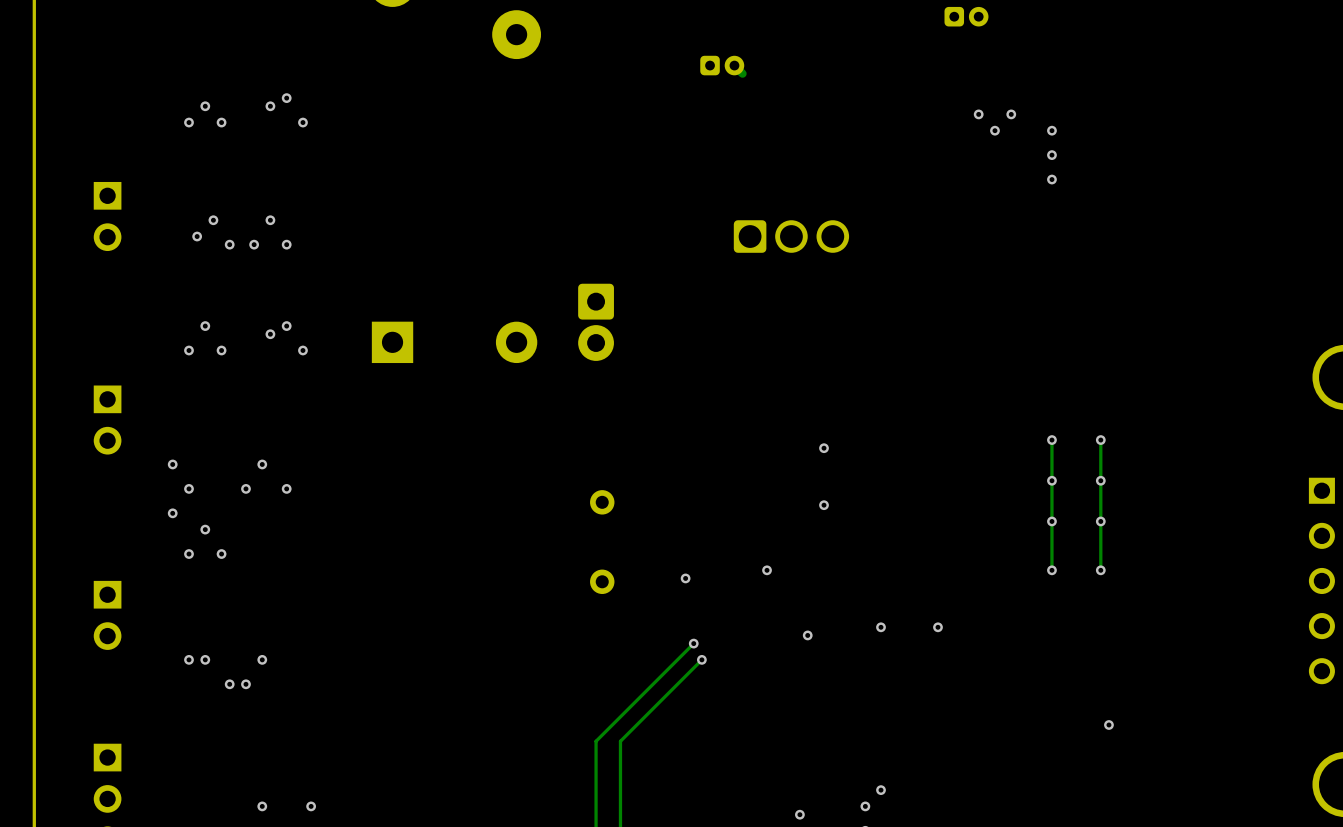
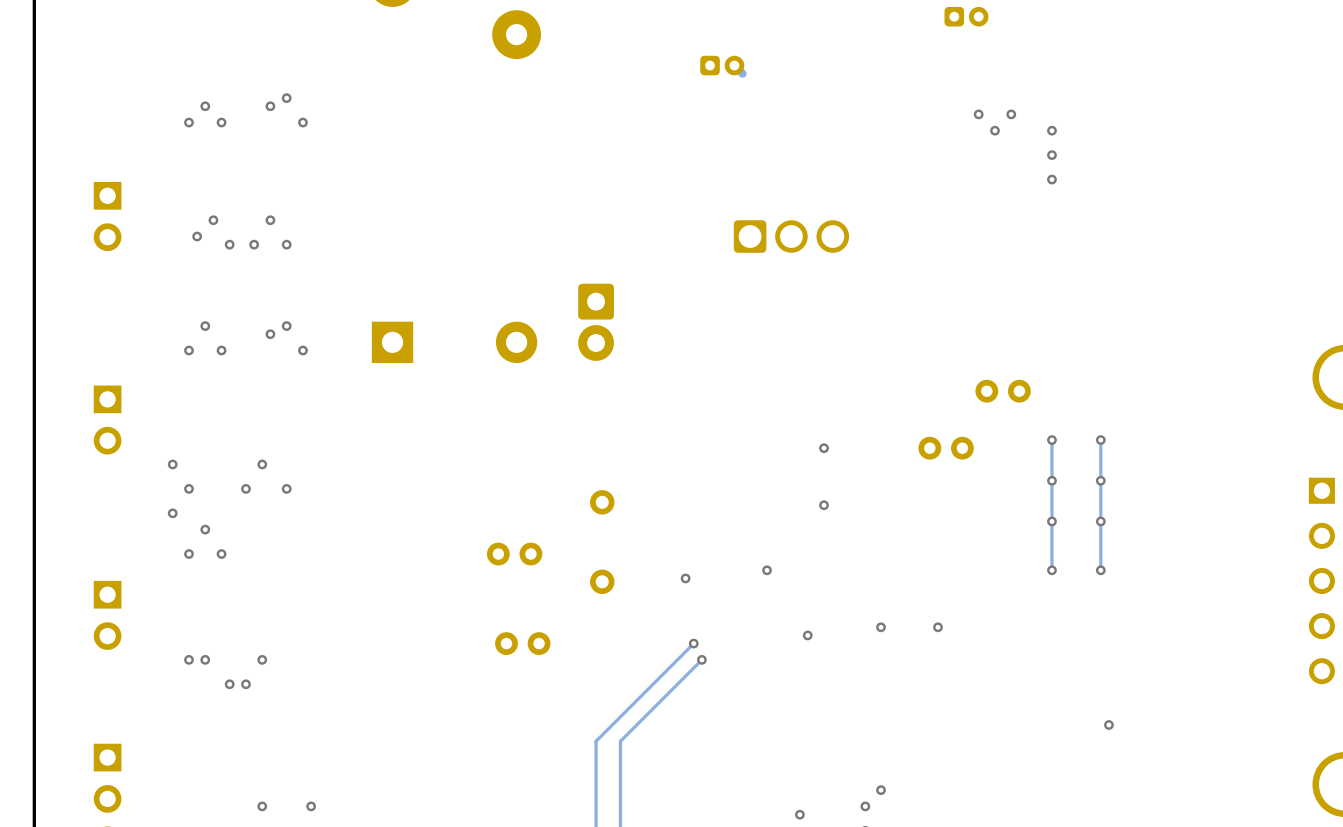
part: none -> (1003, 391)
part: none -> (946, 448)
part: none -> (514, 554)
part: none -> (522, 643)

